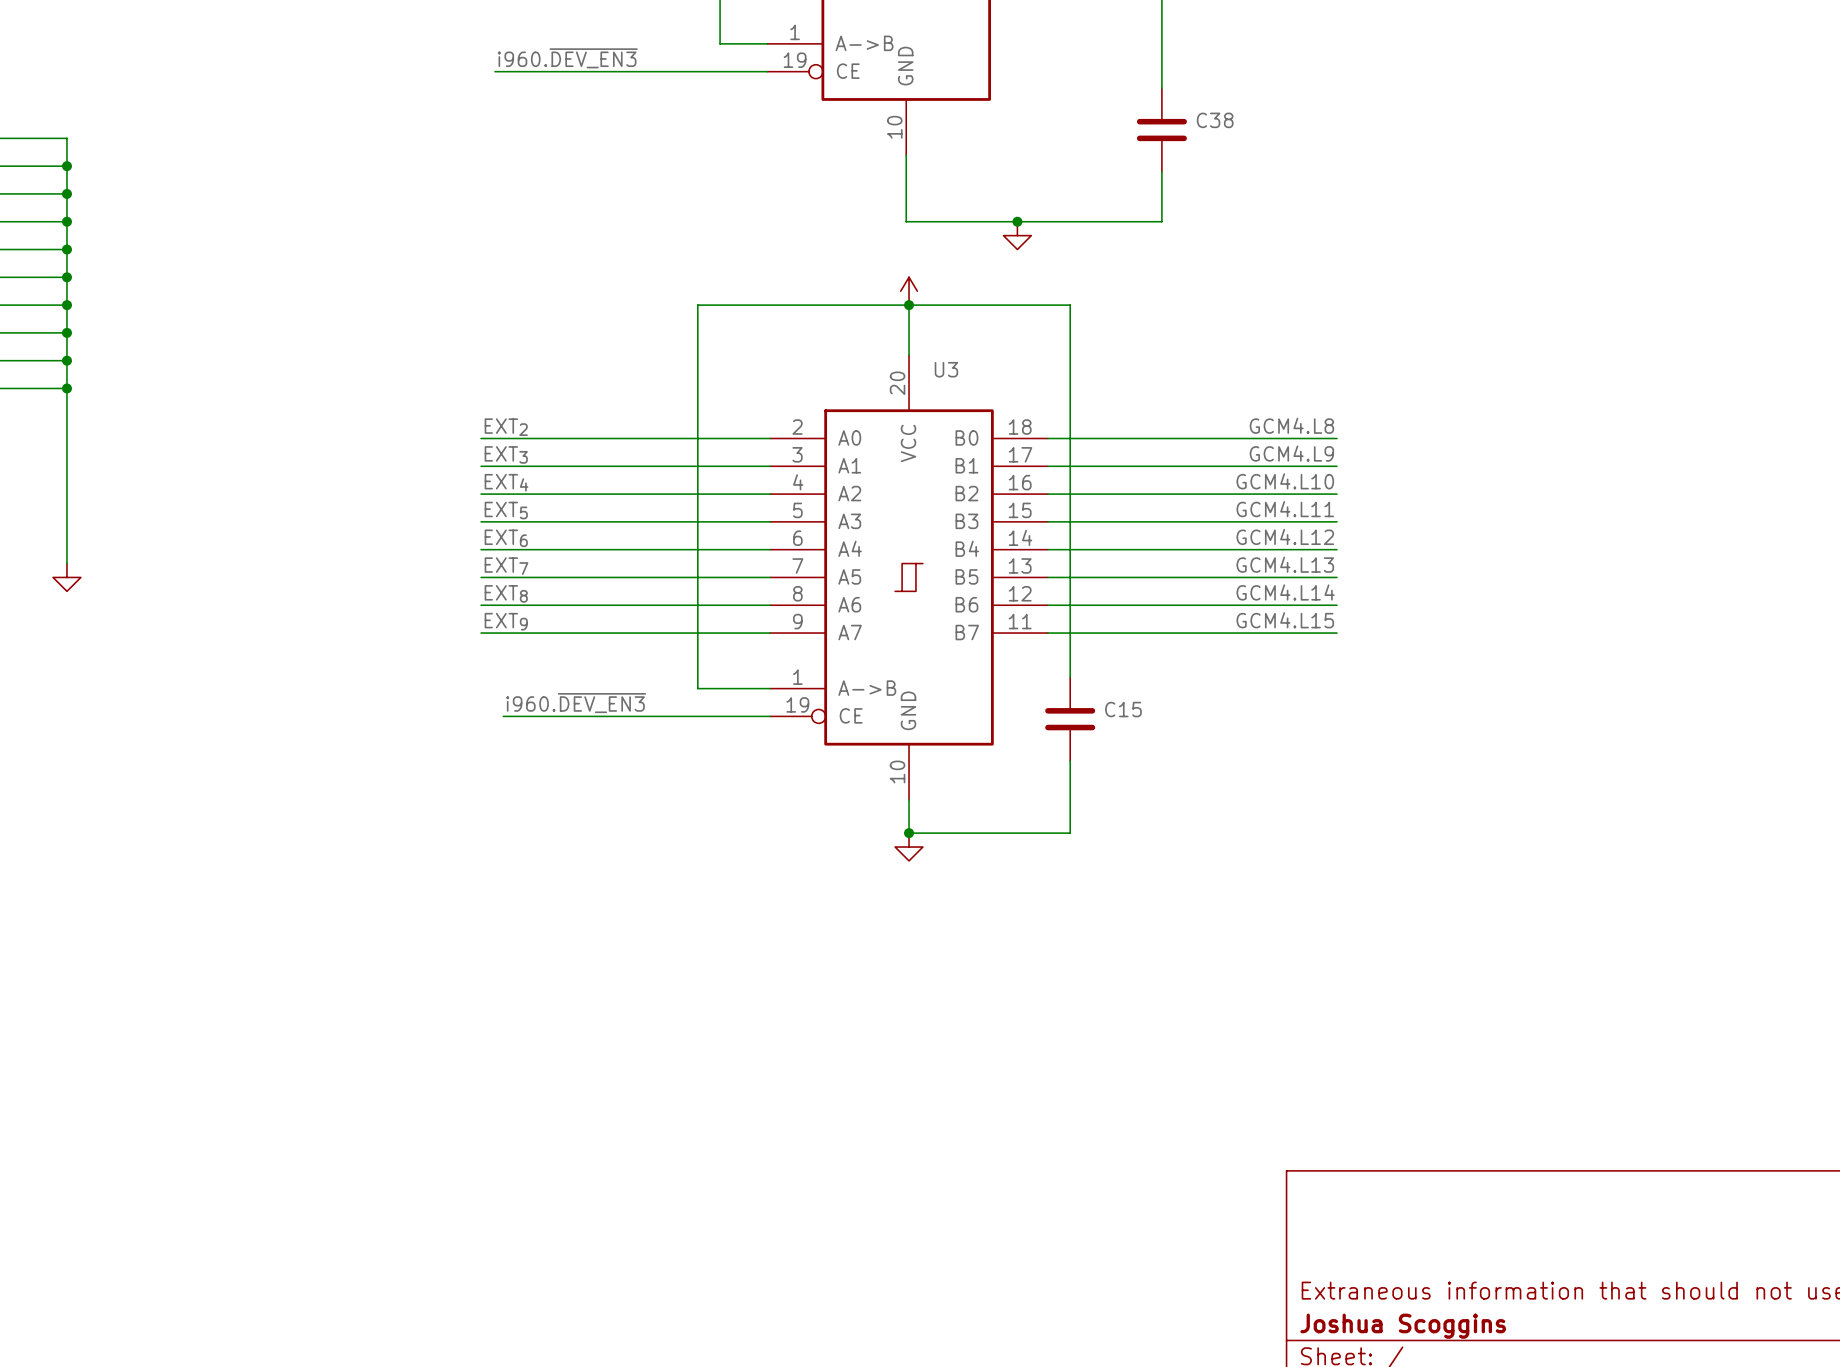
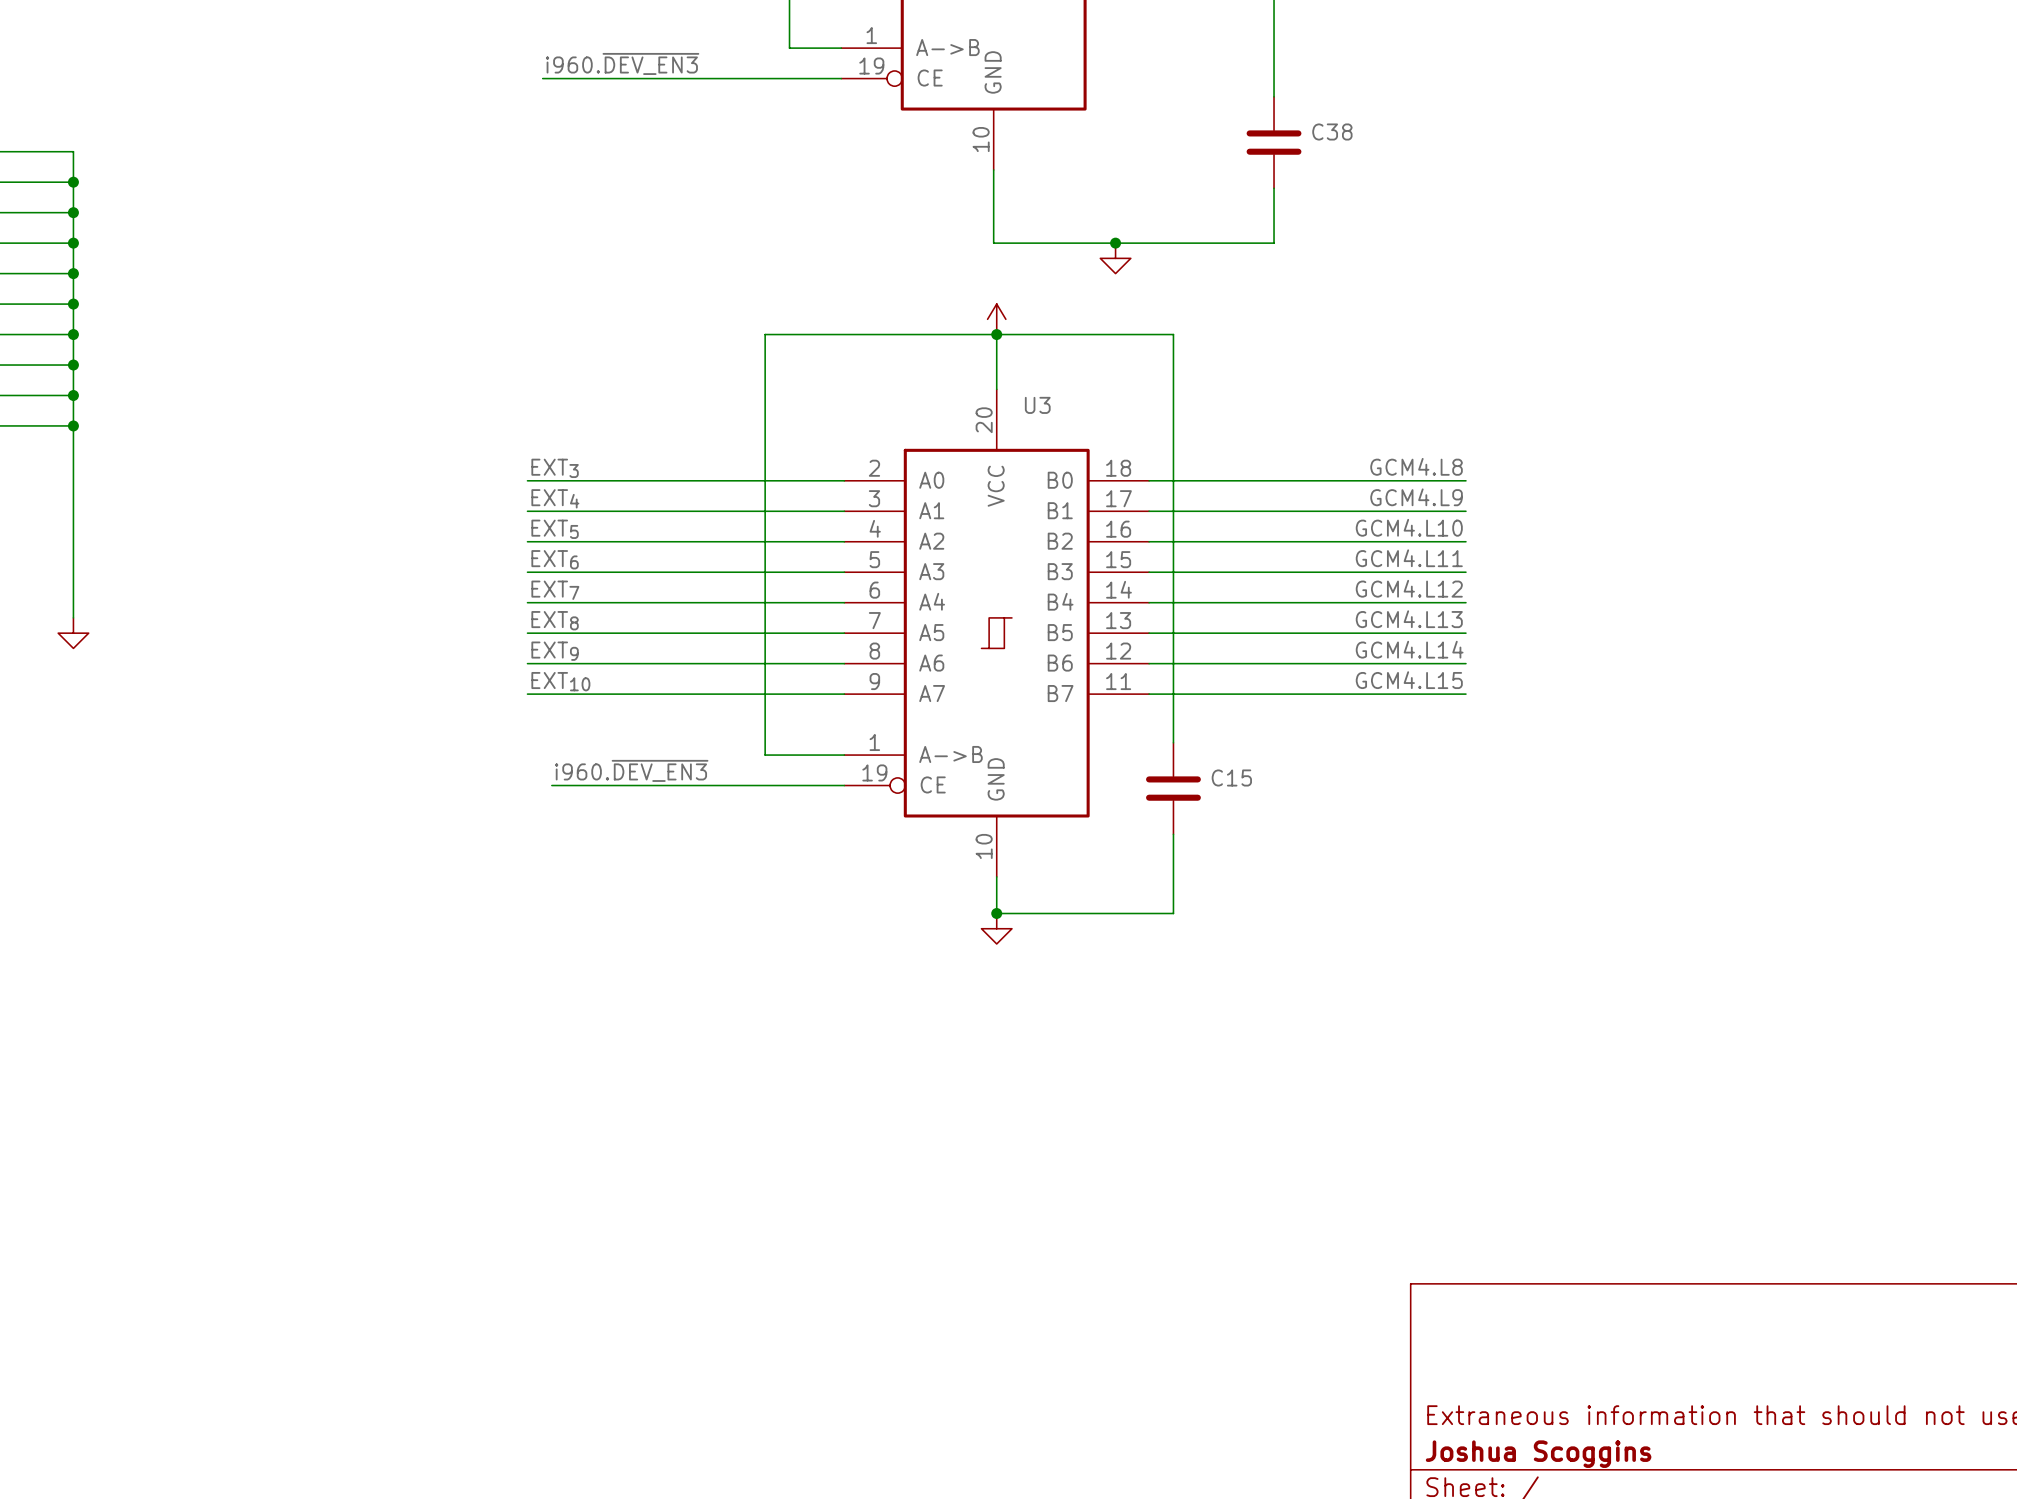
label: EXT2 (506, 427) -> EXT3 (555, 468)
label: EXT3 (506, 454) -> EXT4 (555, 498)
label: EXT4 (506, 482) -> EXT5 (555, 529)
label: EXT5 (506, 510) -> EXT6 (555, 559)
label: EXT6 (506, 538) -> EXT7 (555, 590)
label: EXT7 (506, 566) -> EXT8 (555, 620)
label: EXT8 (506, 593) -> EXT9 (555, 651)
label: EXT9 (506, 621) -> EXT10 (560, 681)

